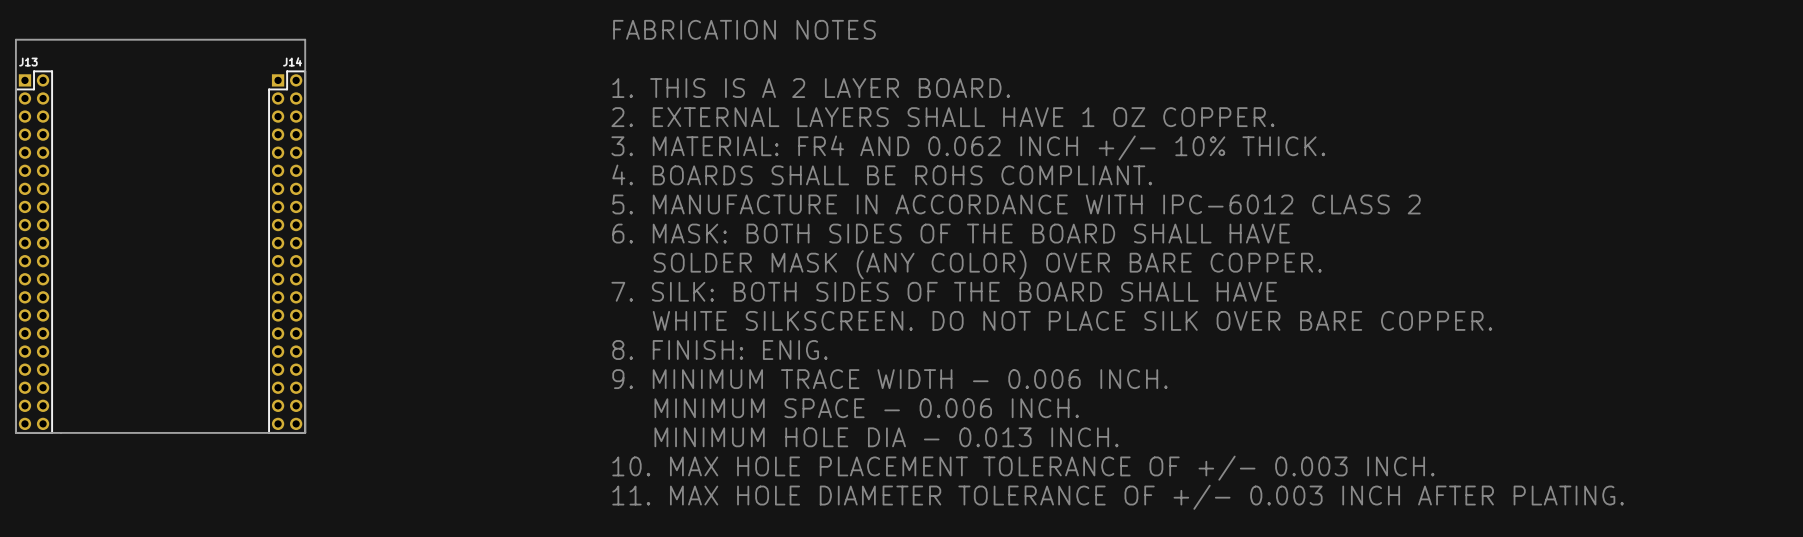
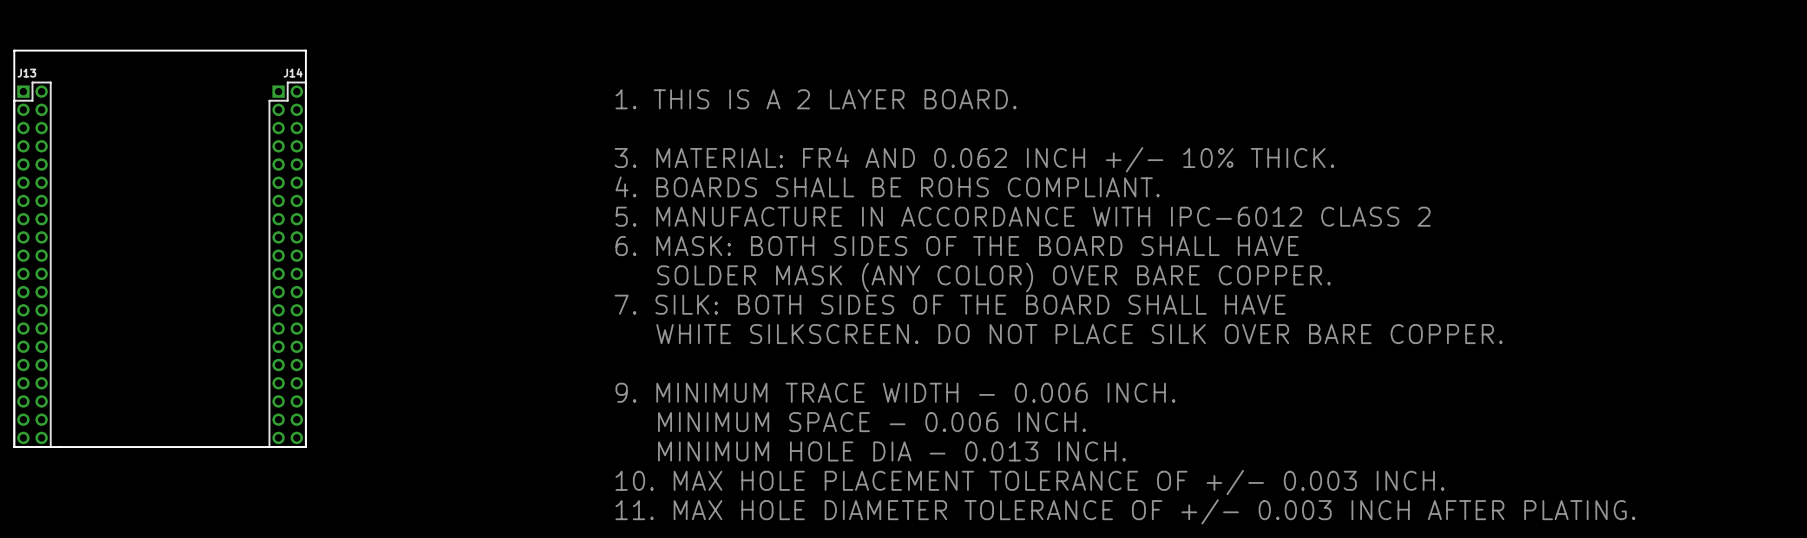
text: FABRICATION NOTES (744, 29) -> none
text: 2. EXTERNAL LAYERS SHALL HAVE 1 OZ COPPER. (942, 117) -> none
text: 8. FINISH: ENIG. (719, 350) -> none

